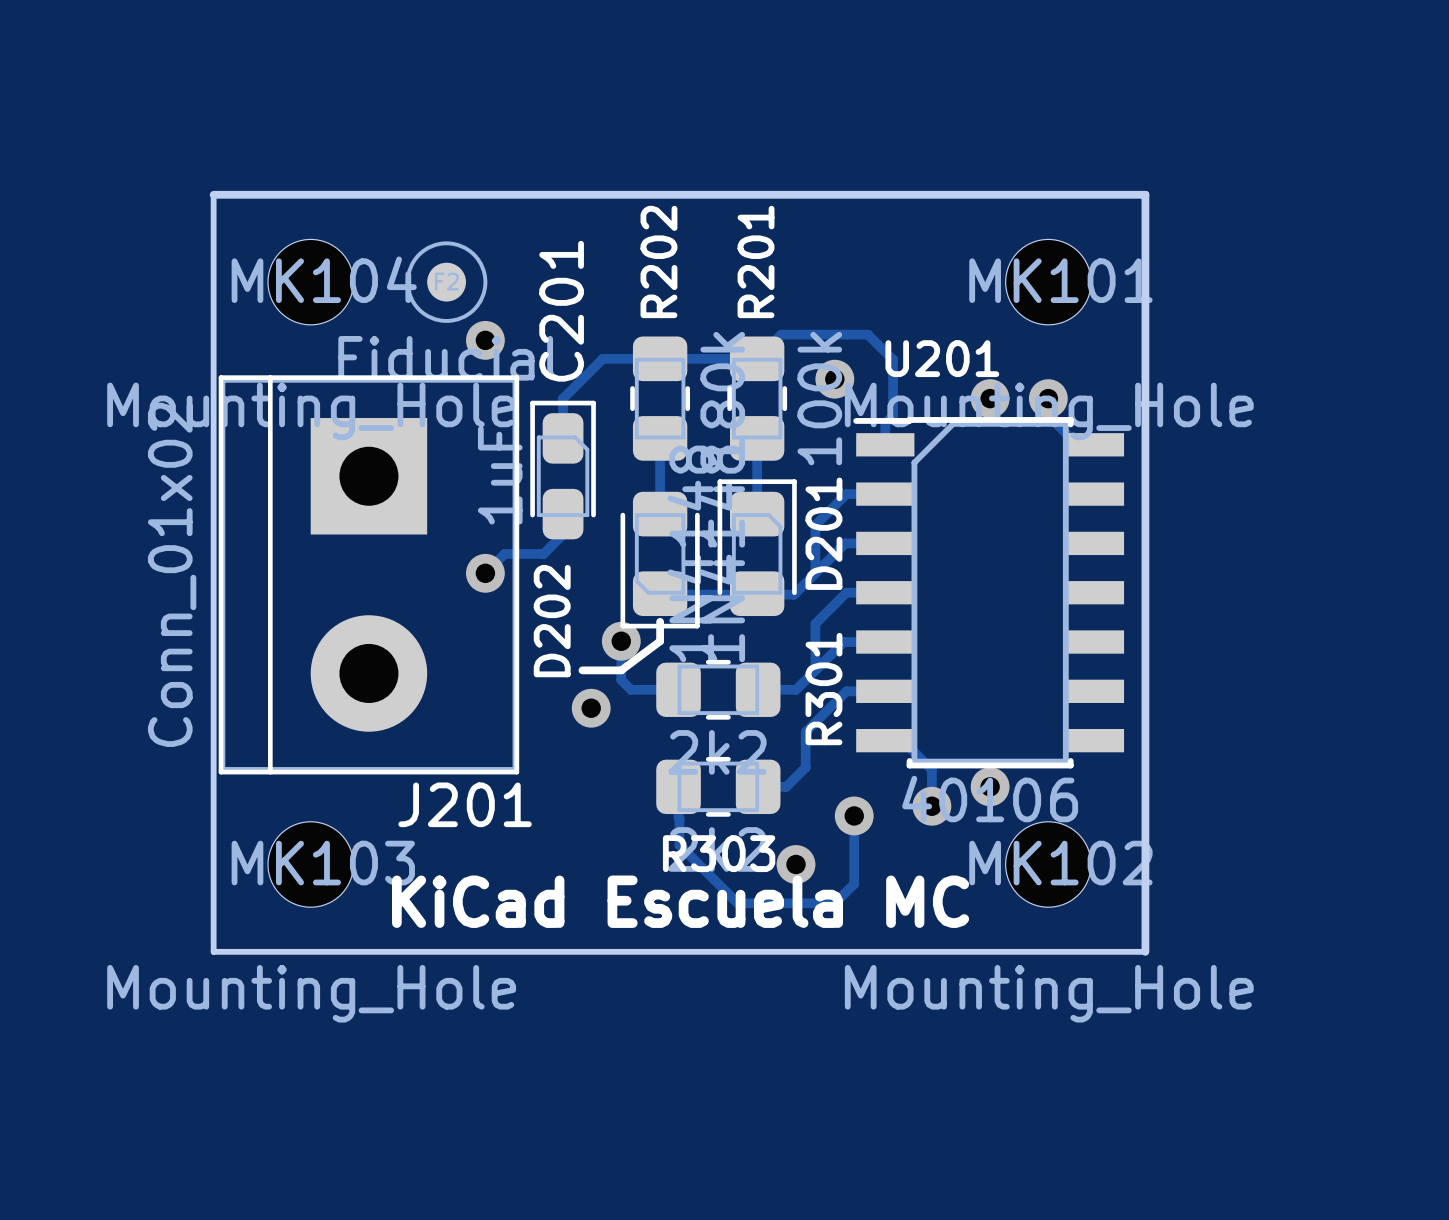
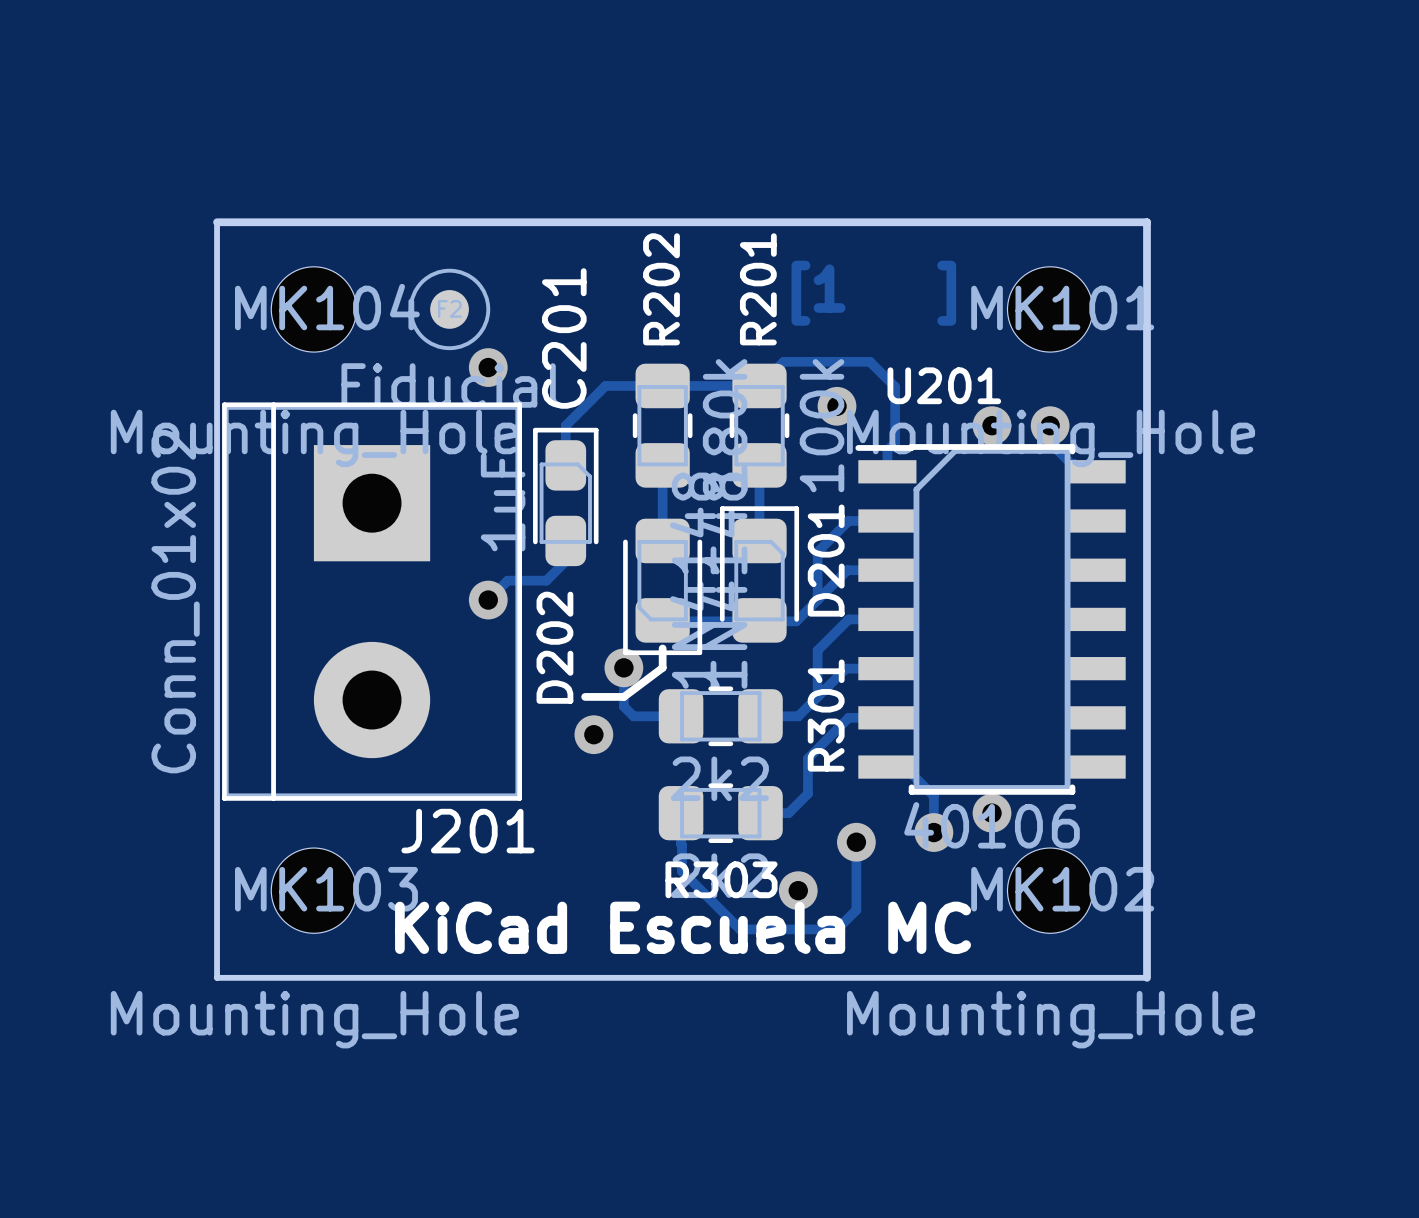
text: none -> [1 ] (873, 293)

